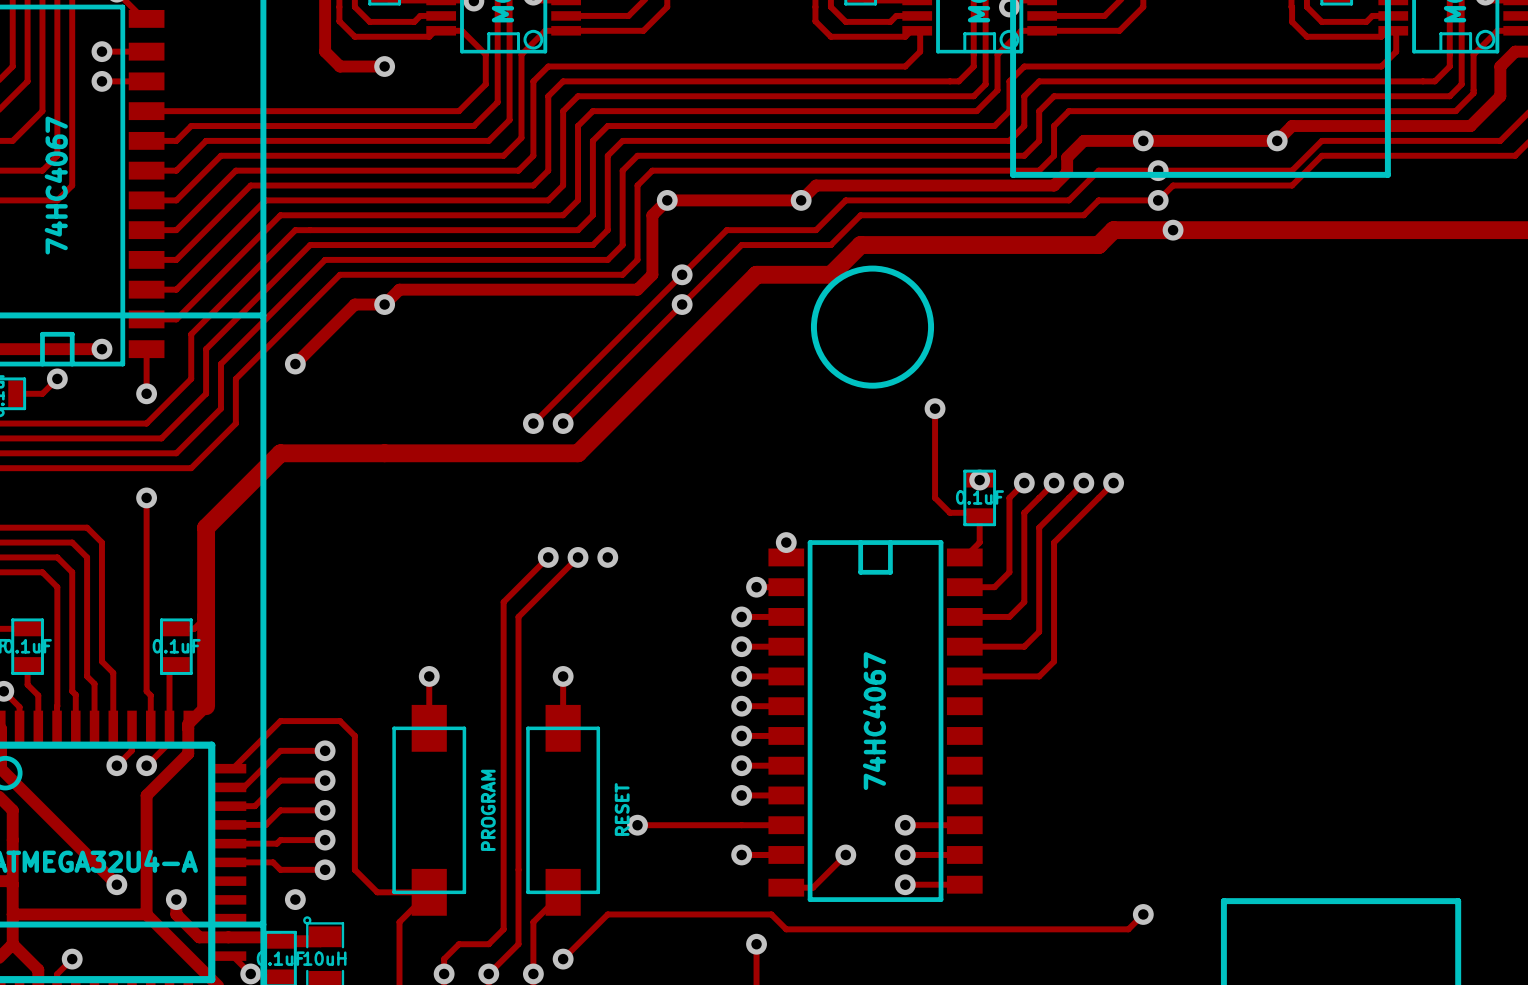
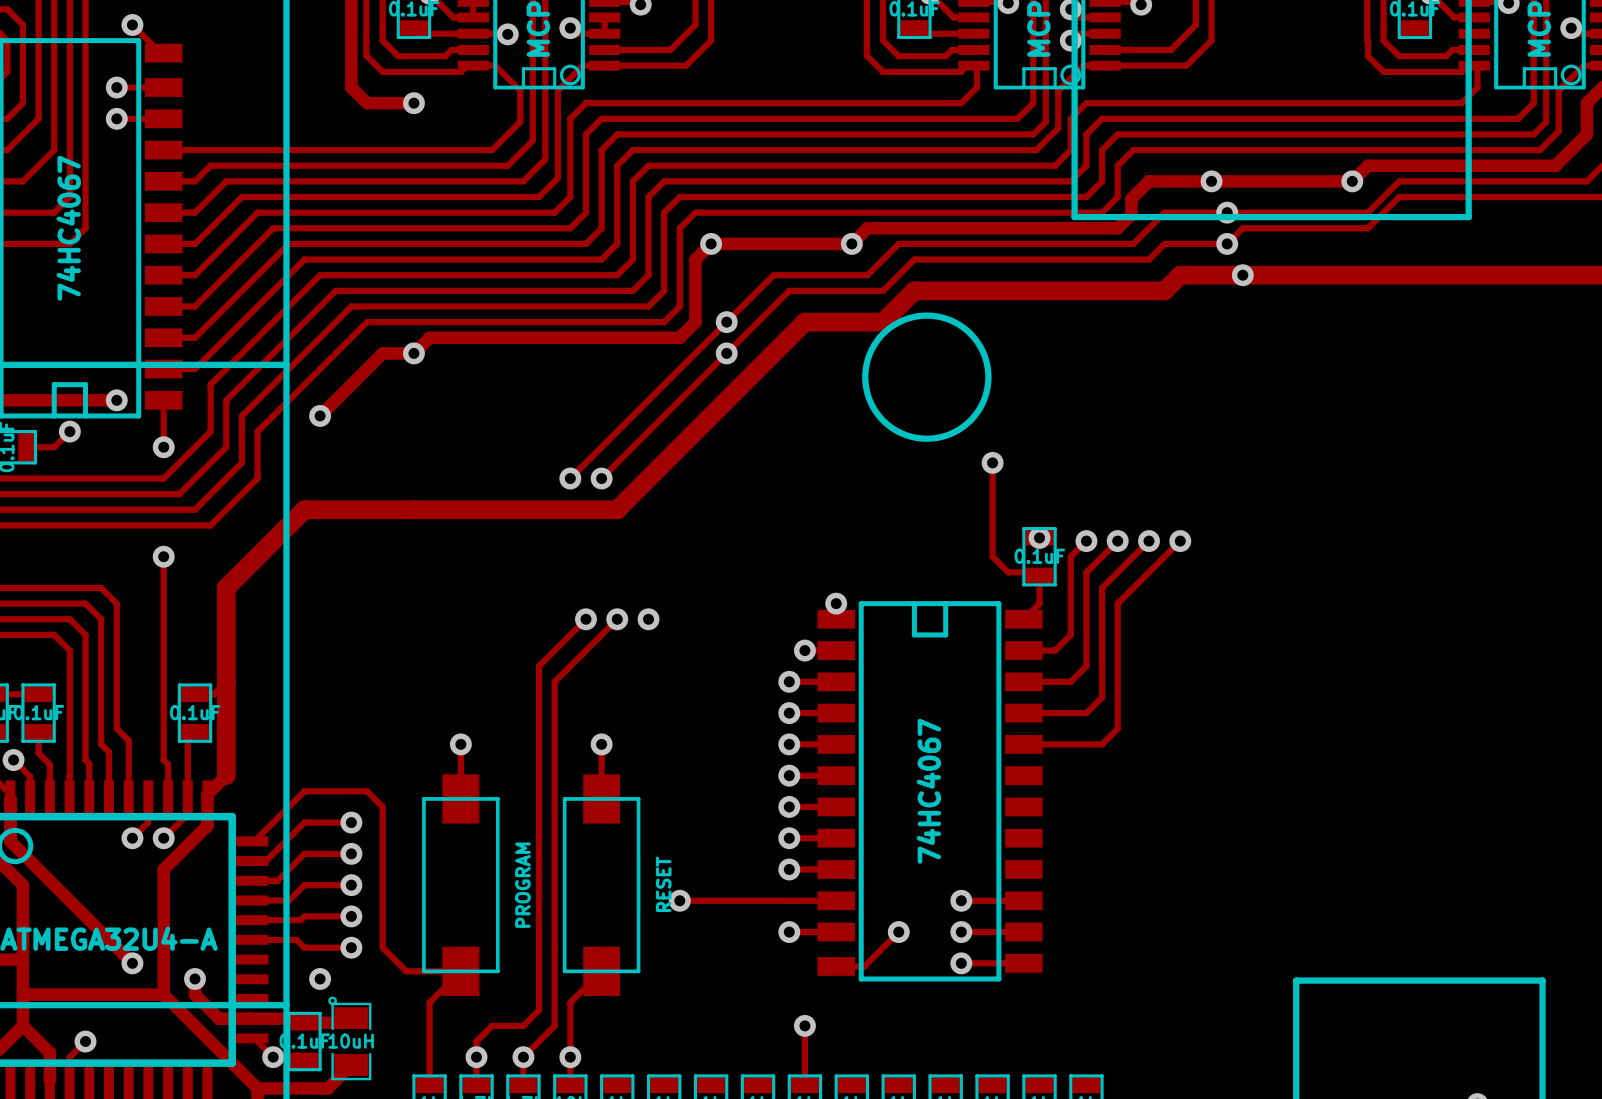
track: (1143, 914) (1128, 929) (786, 929) (771, 914) (607, 914) (563, 959) -> none
via: (1143, 914) -> none
via: (563, 959) -> none

